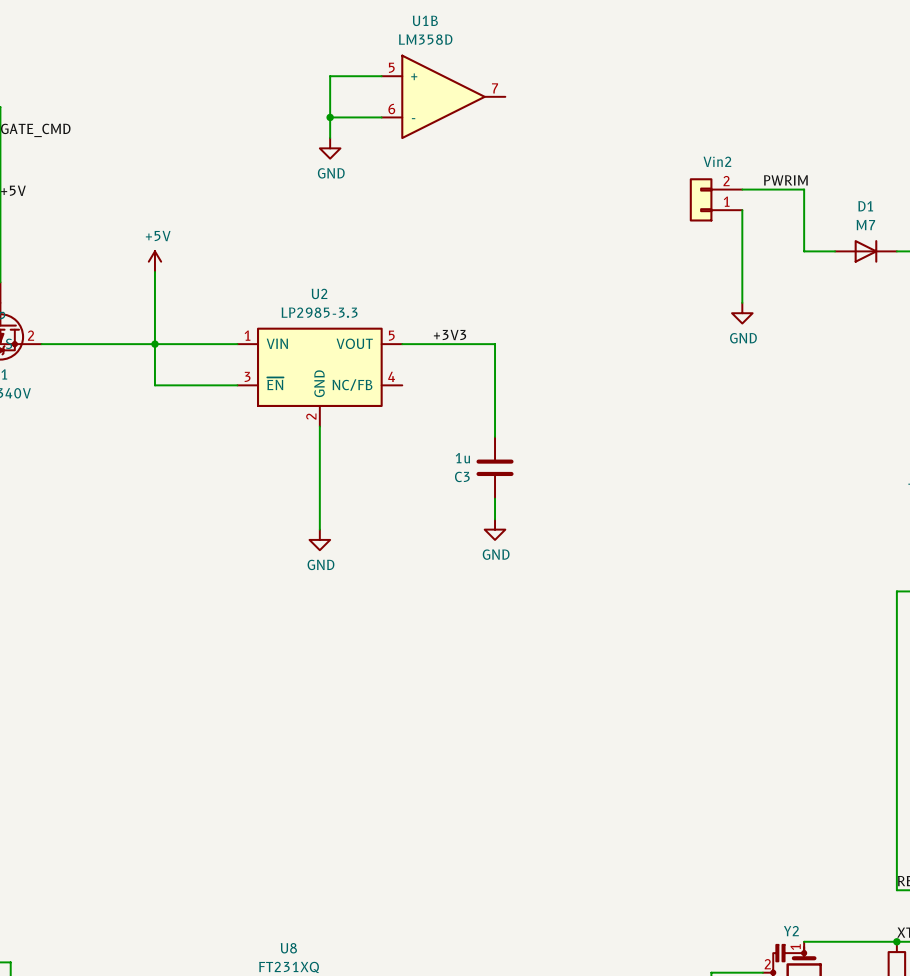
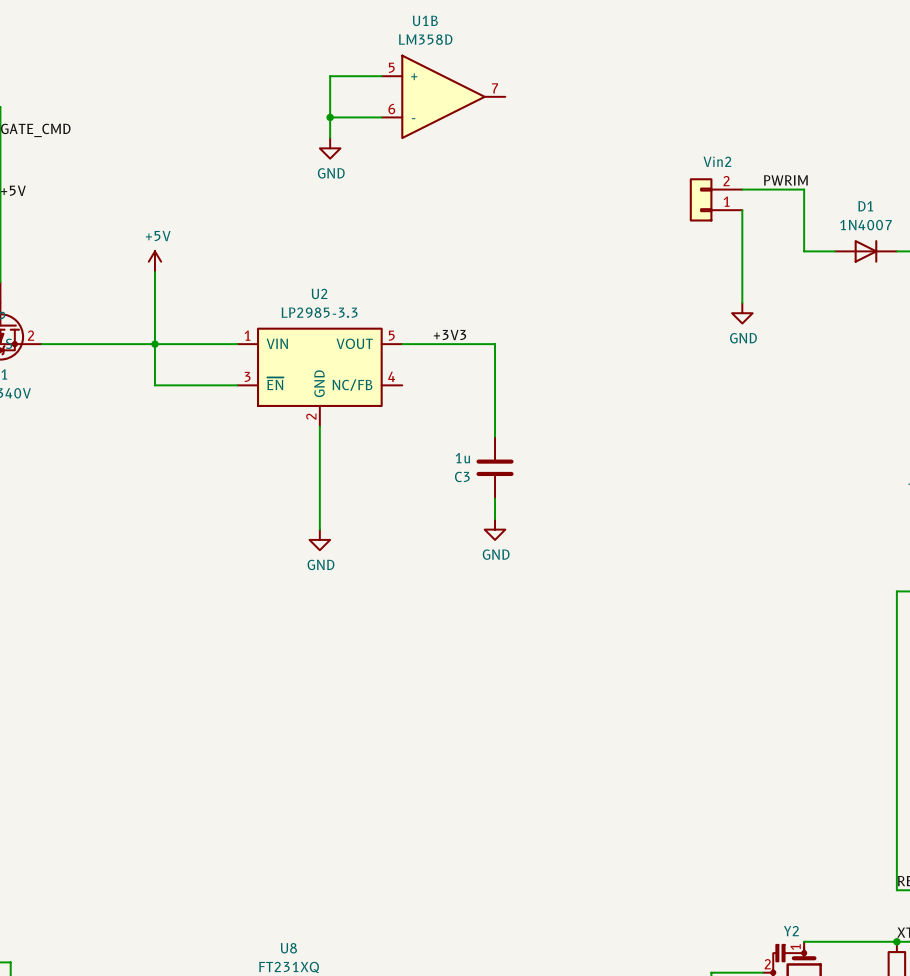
D1 value: M7 (865, 225) -> 1N4007 (865, 225)

